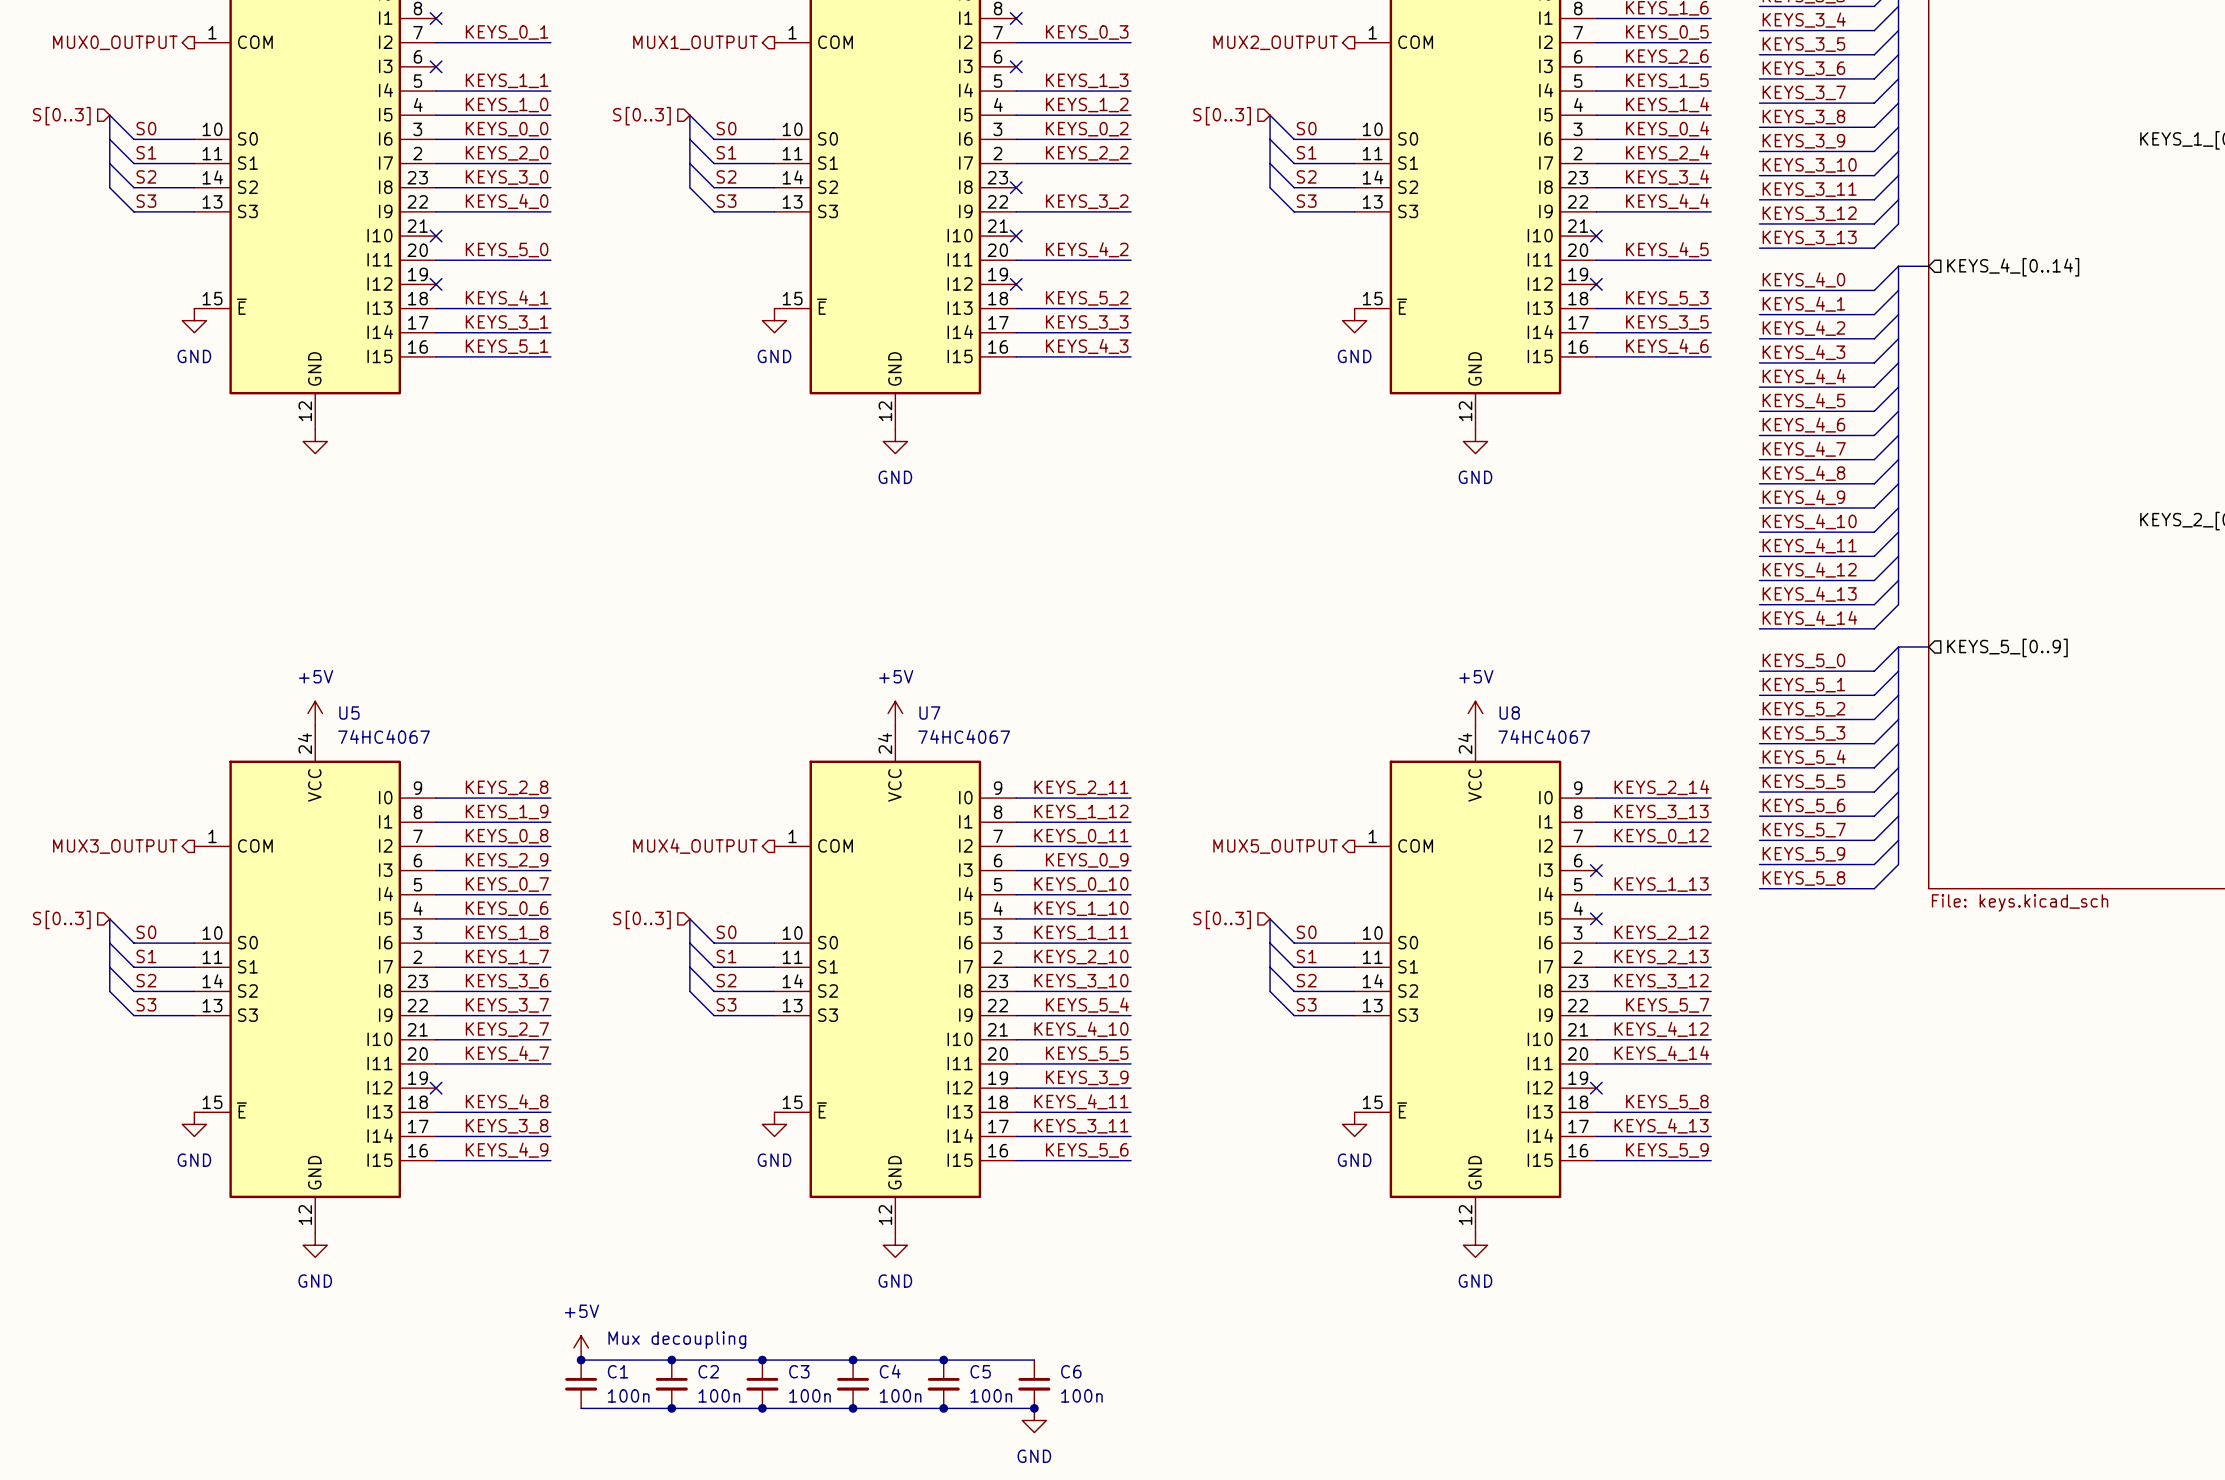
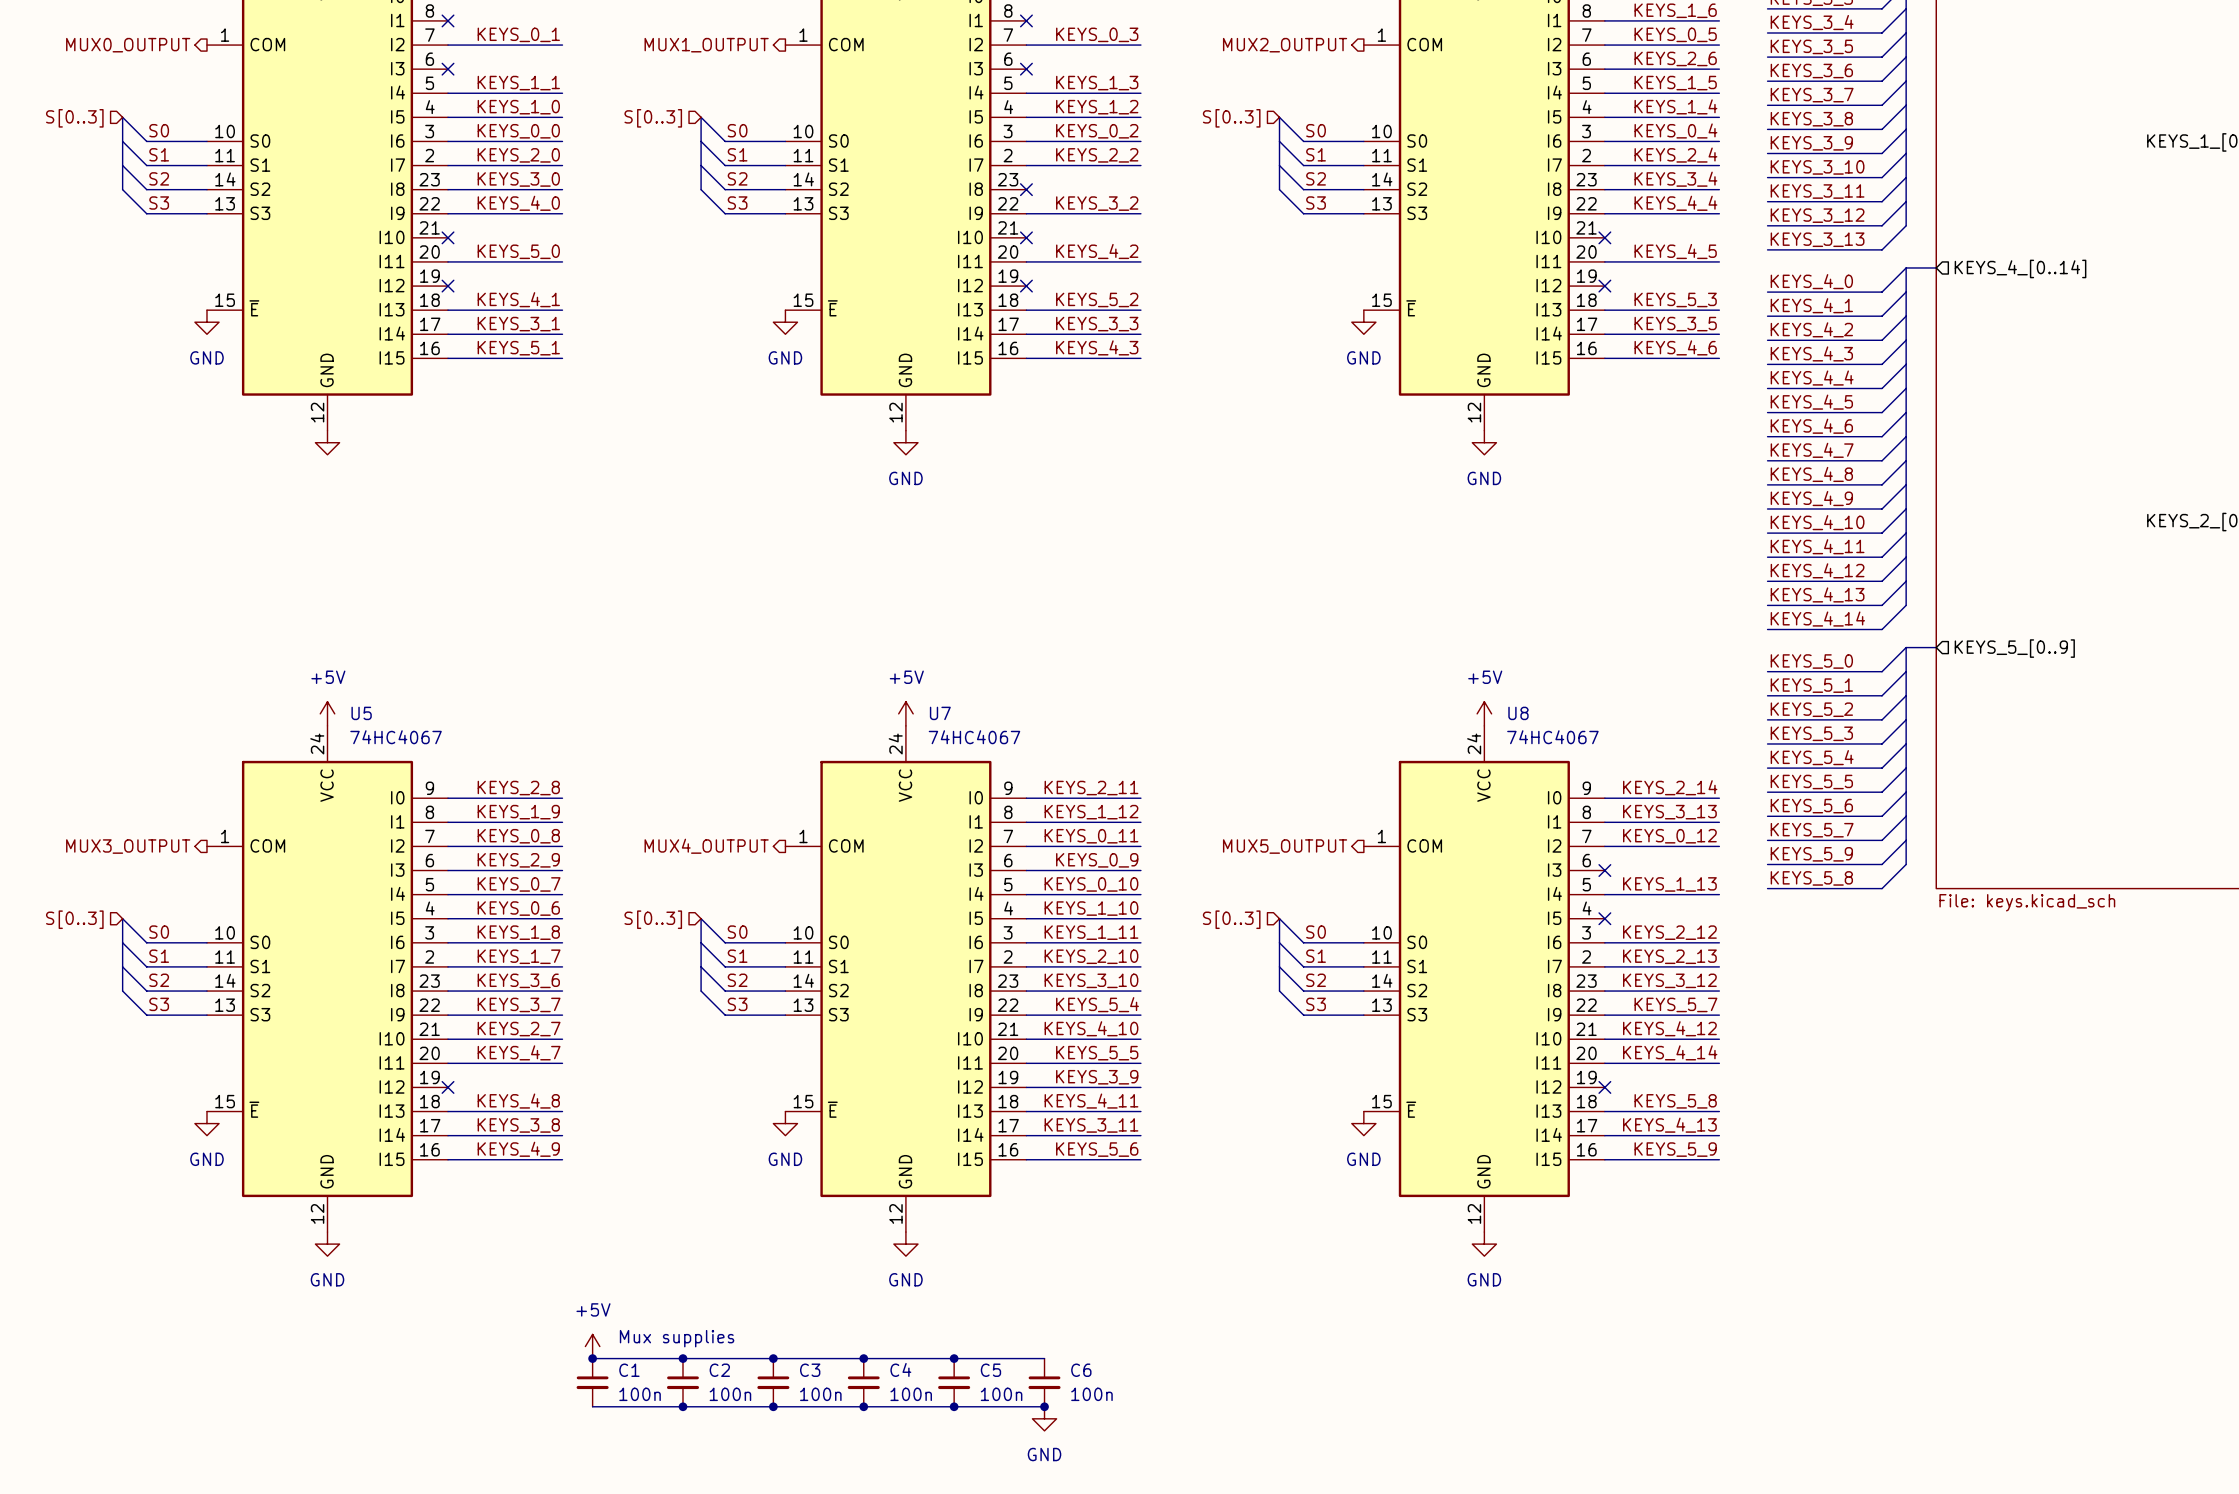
text: Mux decoupling (677, 1340) -> Mux supplies (677, 1338)

